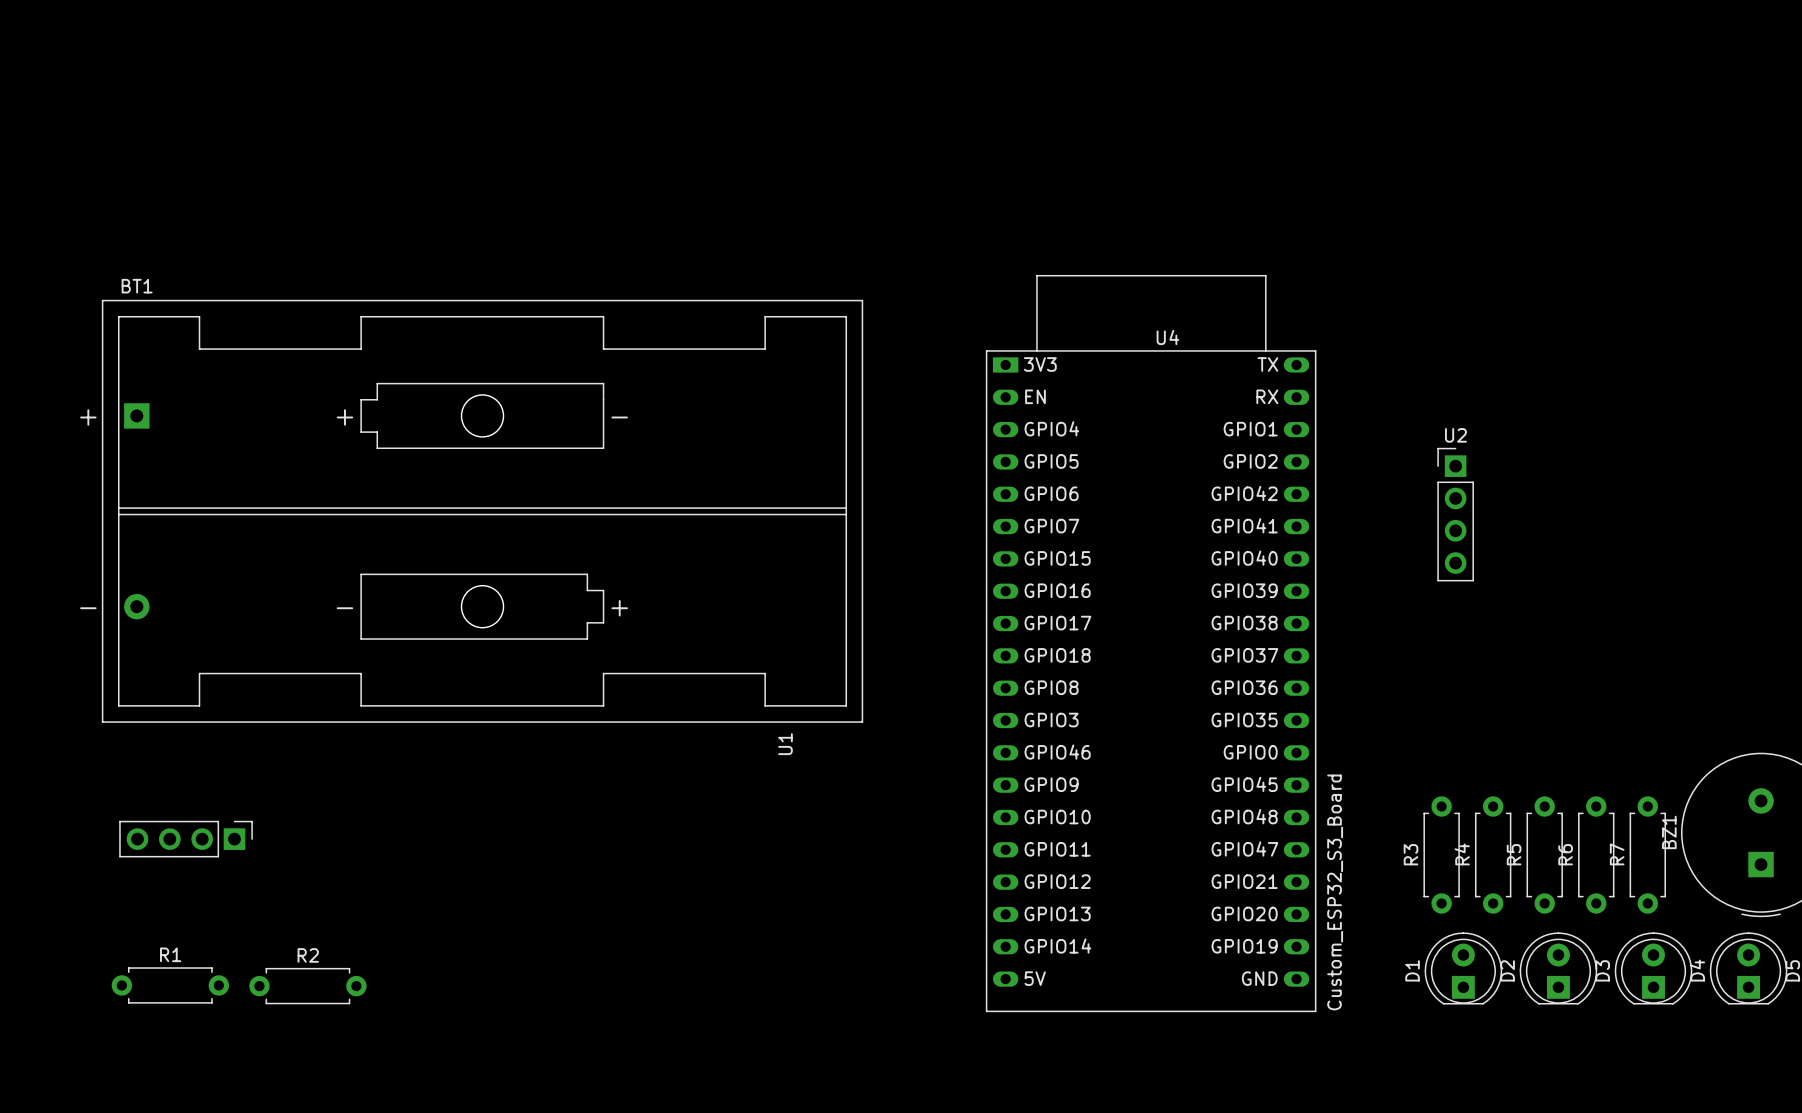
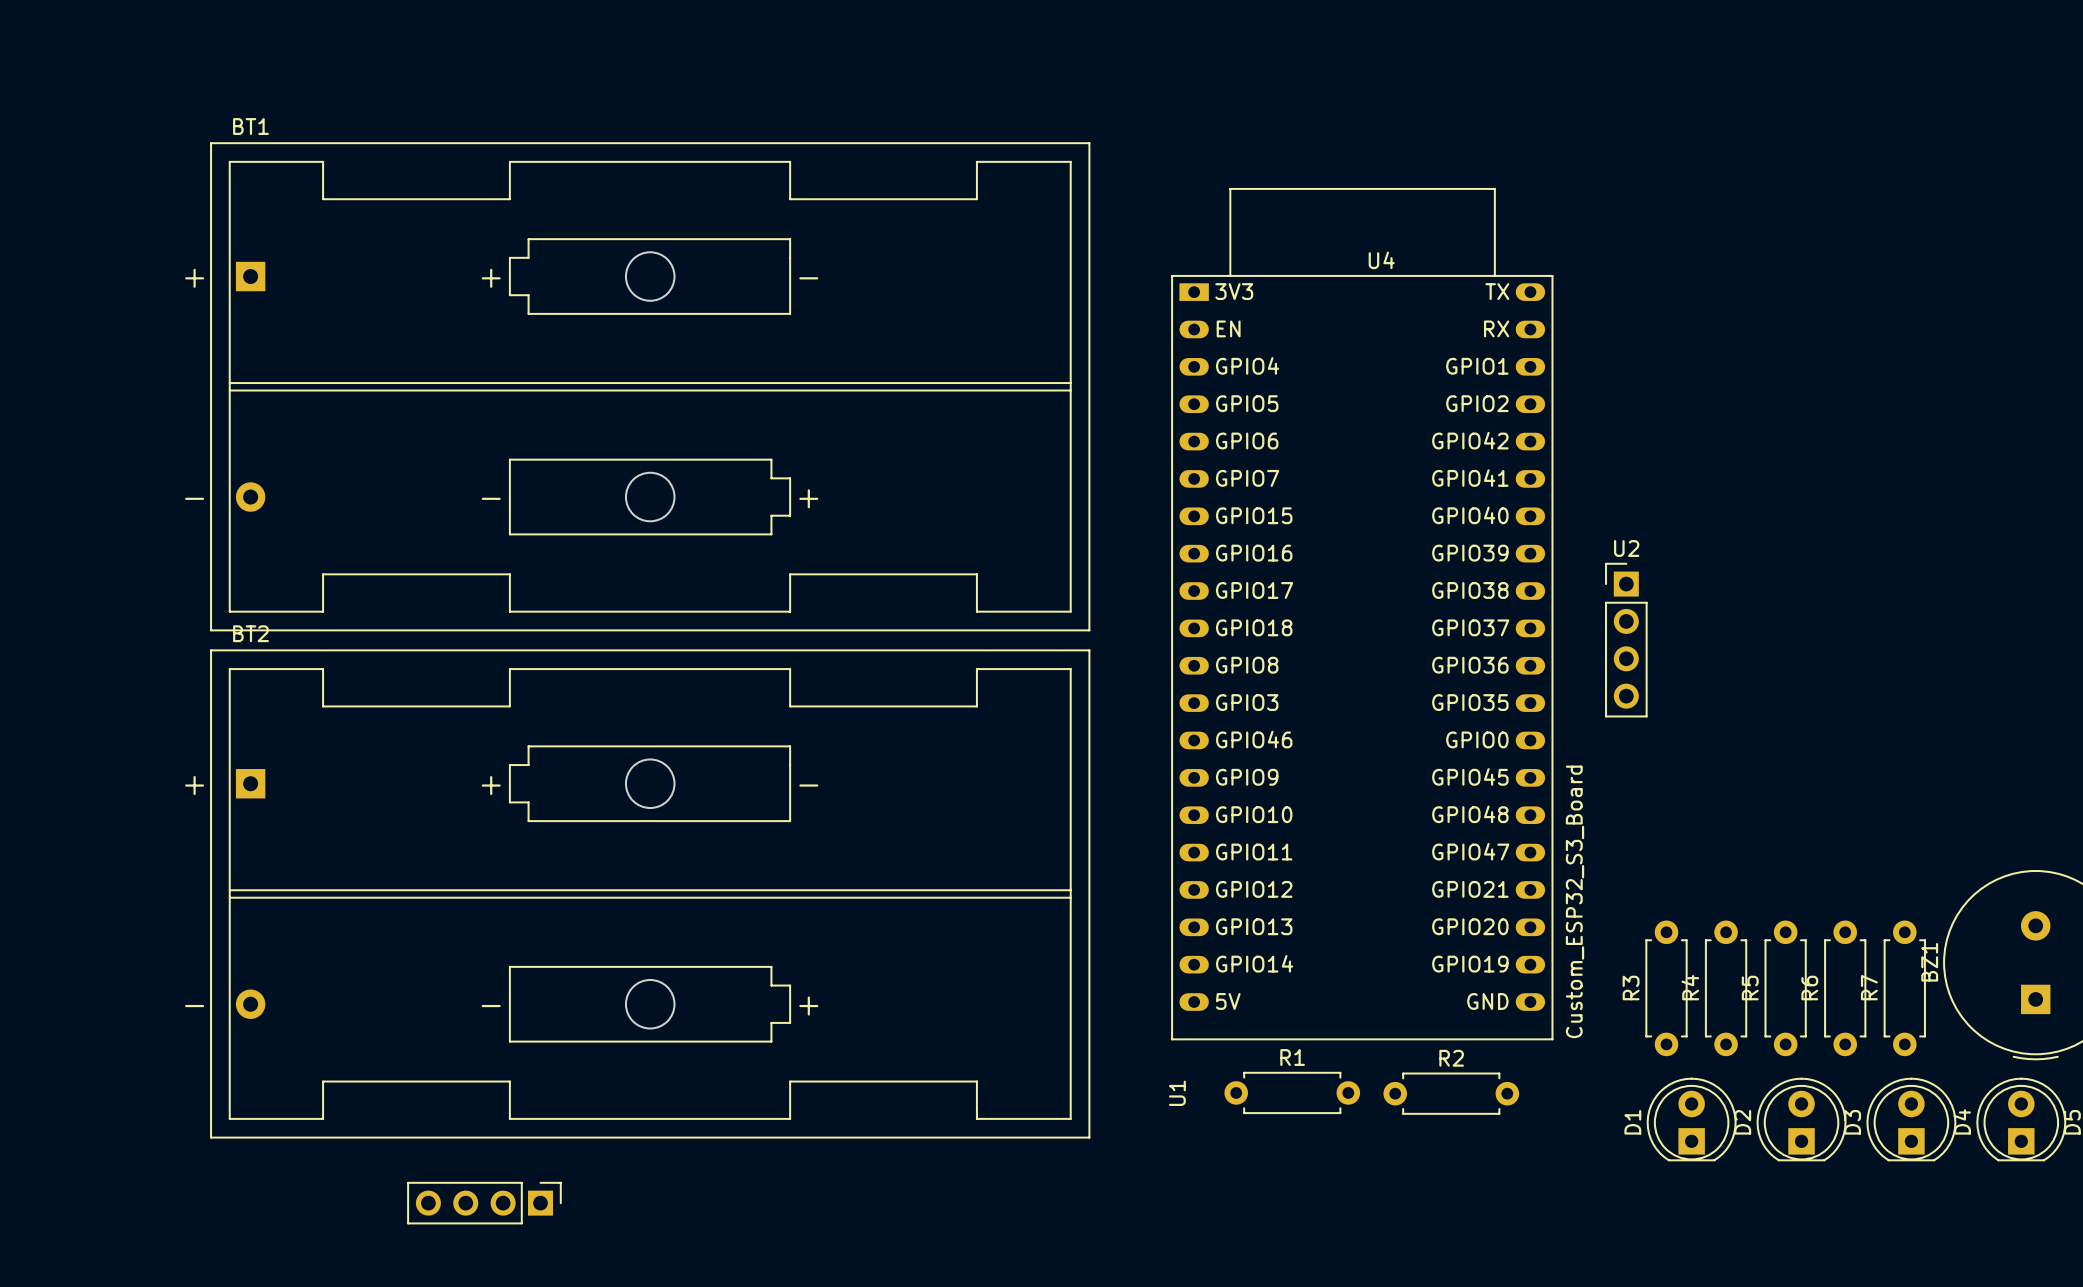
BT1 position: (482, 511) -> (650, 386)
U2 position: (1455, 514) -> (1626, 640)
U4 position: (1151, 643) -> (1362, 614)
BT2: none -> (650, 893)
U1 position: (186, 839) -> (484, 1203)
R1 position: (170, 985) -> (1292, 1092)
R2 position: (307, 986) -> (1451, 1093)

